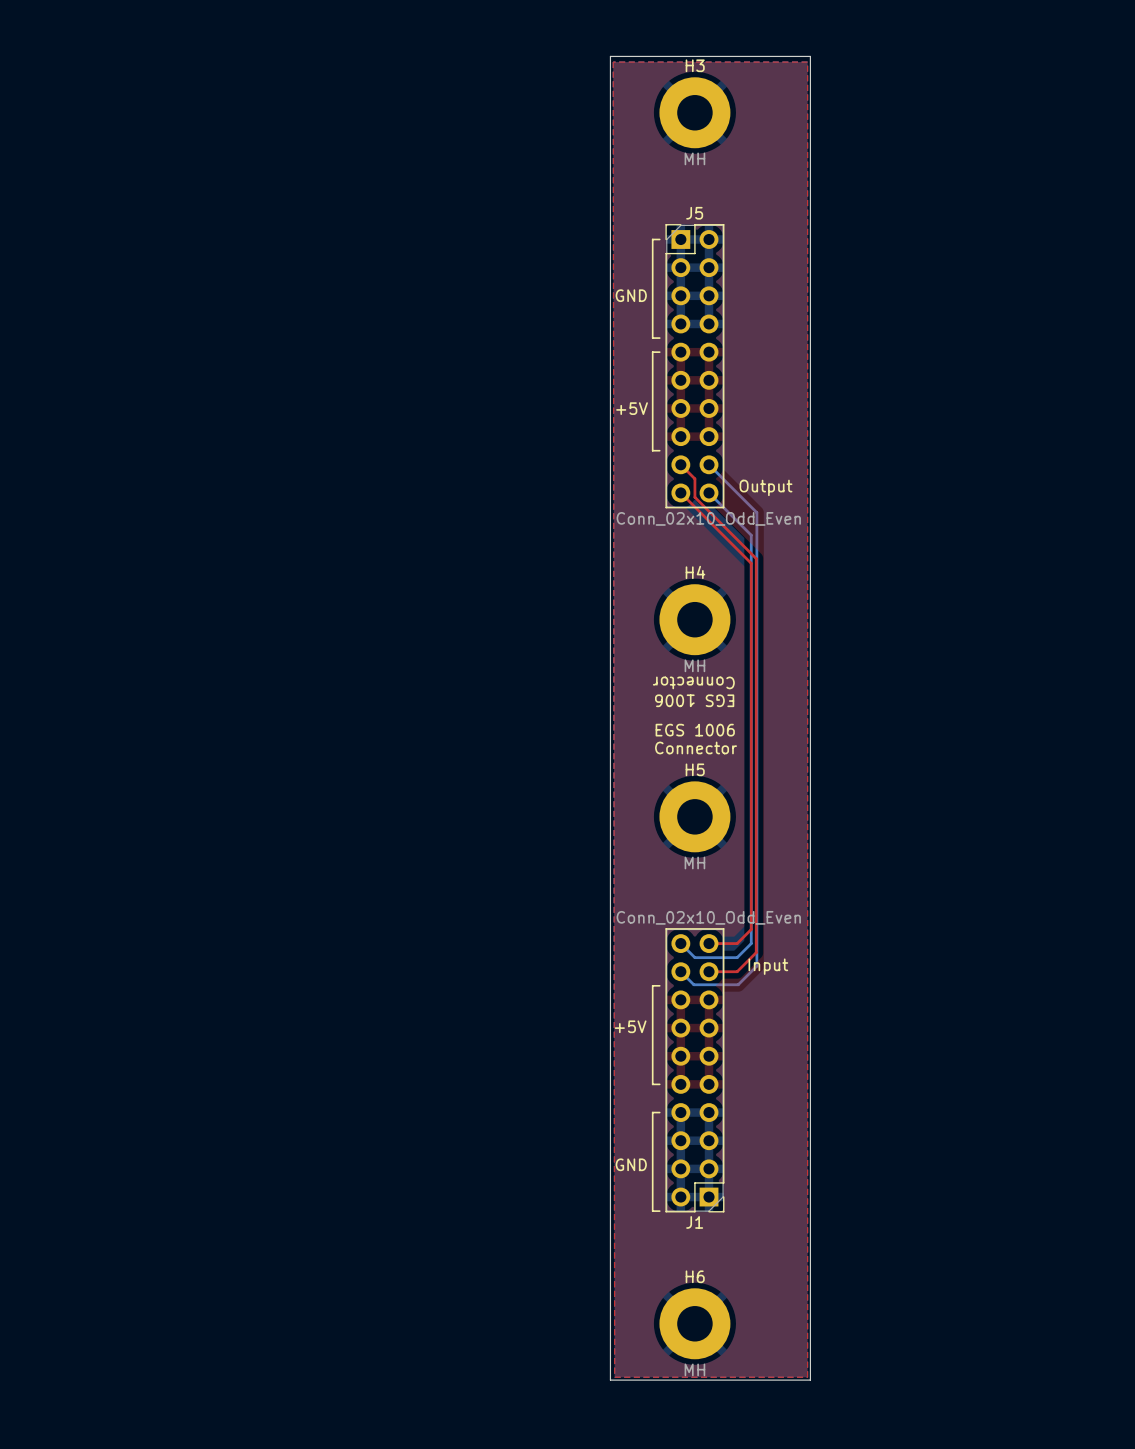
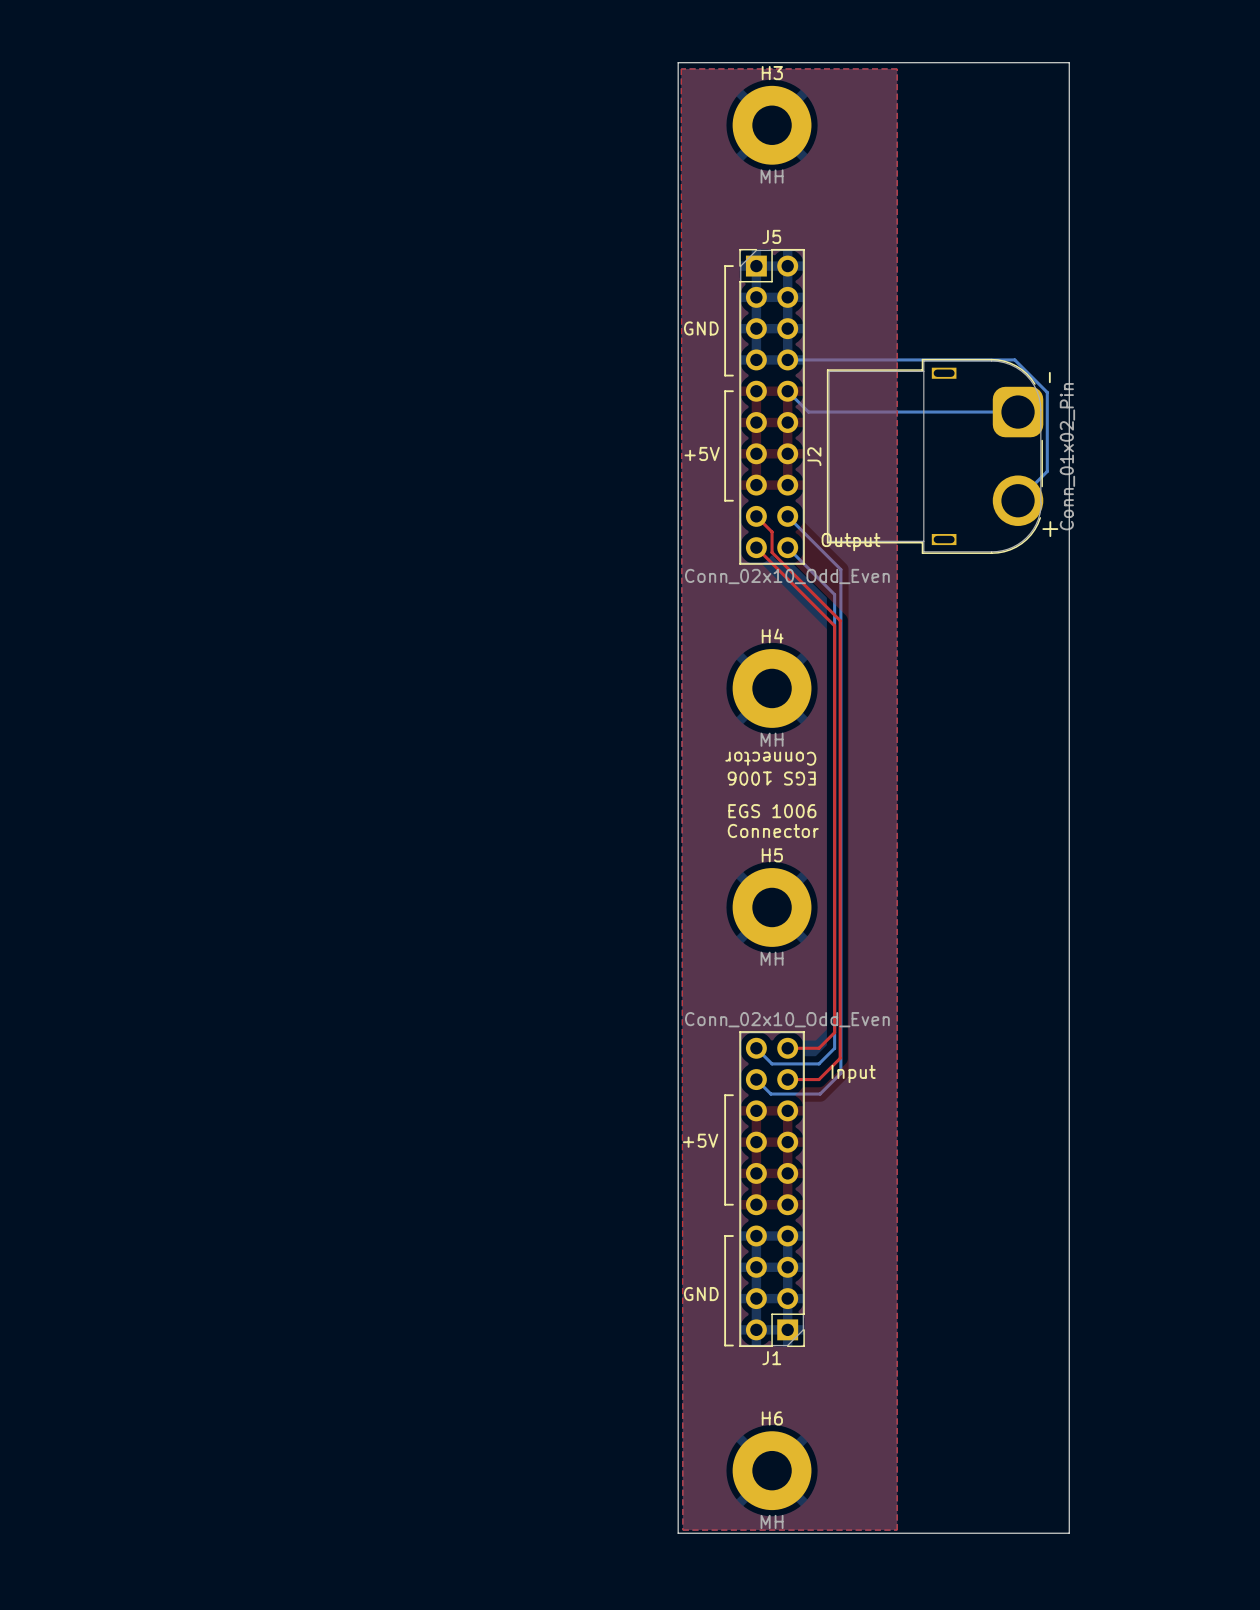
board edge: (810, 56) (810, 1380) -> (900, 62) (1069, 62) (1069, 1533) (900, 1533)
bottom track: none -> (787, 359) (1014, 359) (1047, 392) (1047, 471) (1018, 500)
bottom track: none -> (787, 391) (808, 412) (1018, 412)
J2: none -> Conn_01x02_Pin (935, 456)

